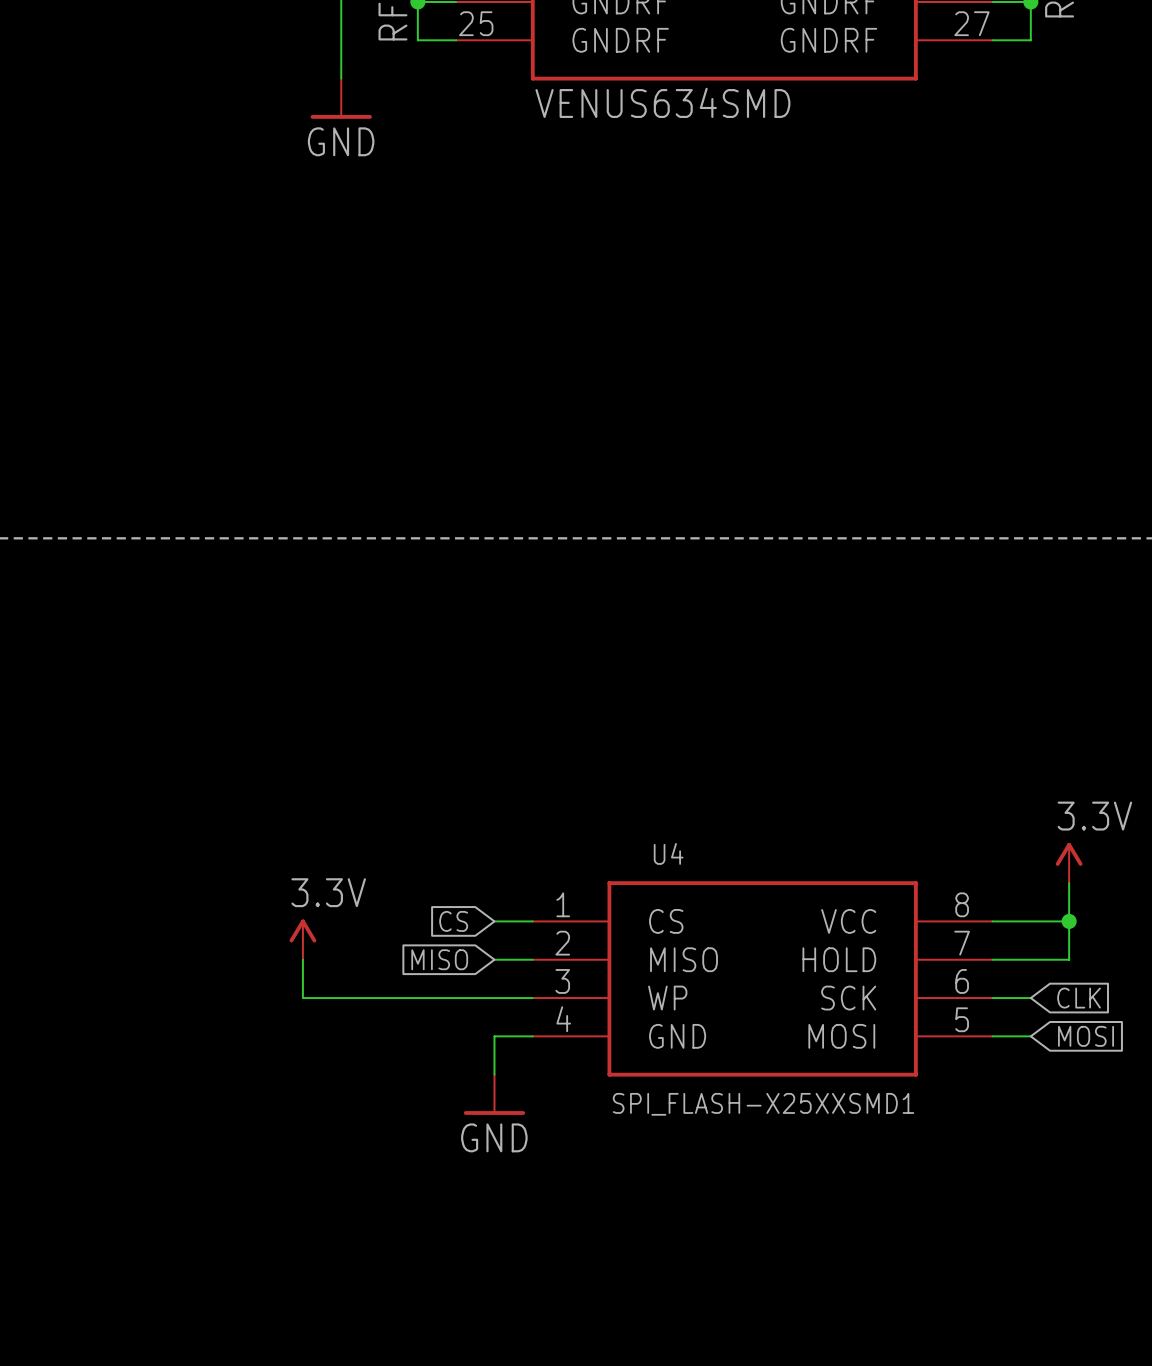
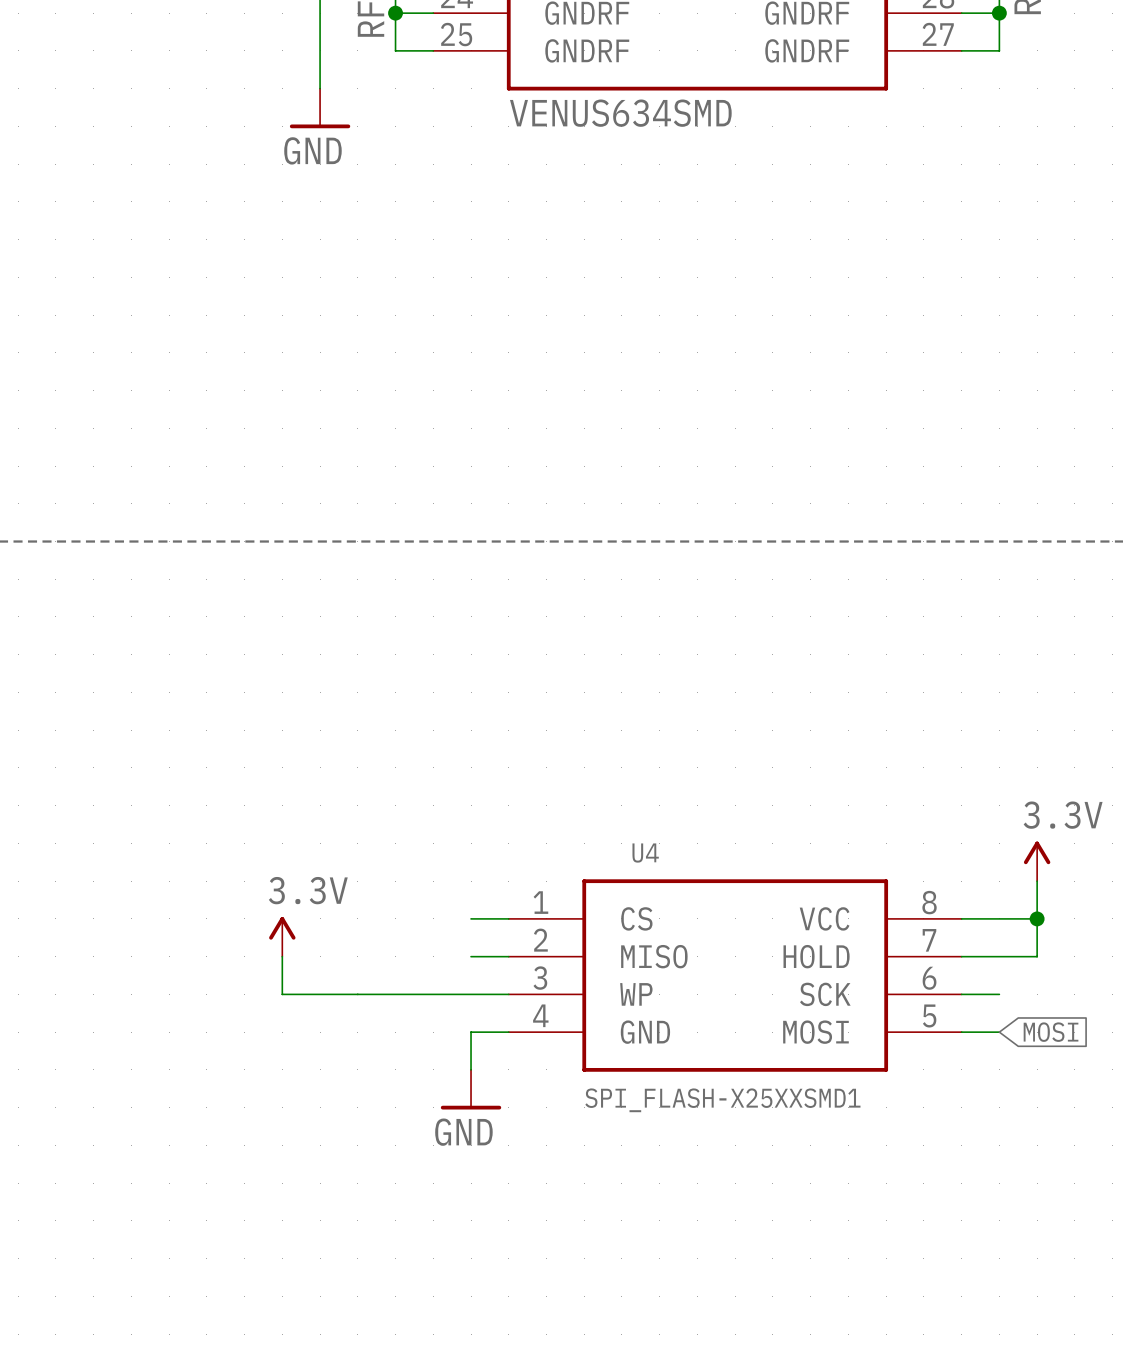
global label: CS (453, 921) -> none
global label: MISO (439, 959) -> none
global label: CLK (1079, 998) -> none

